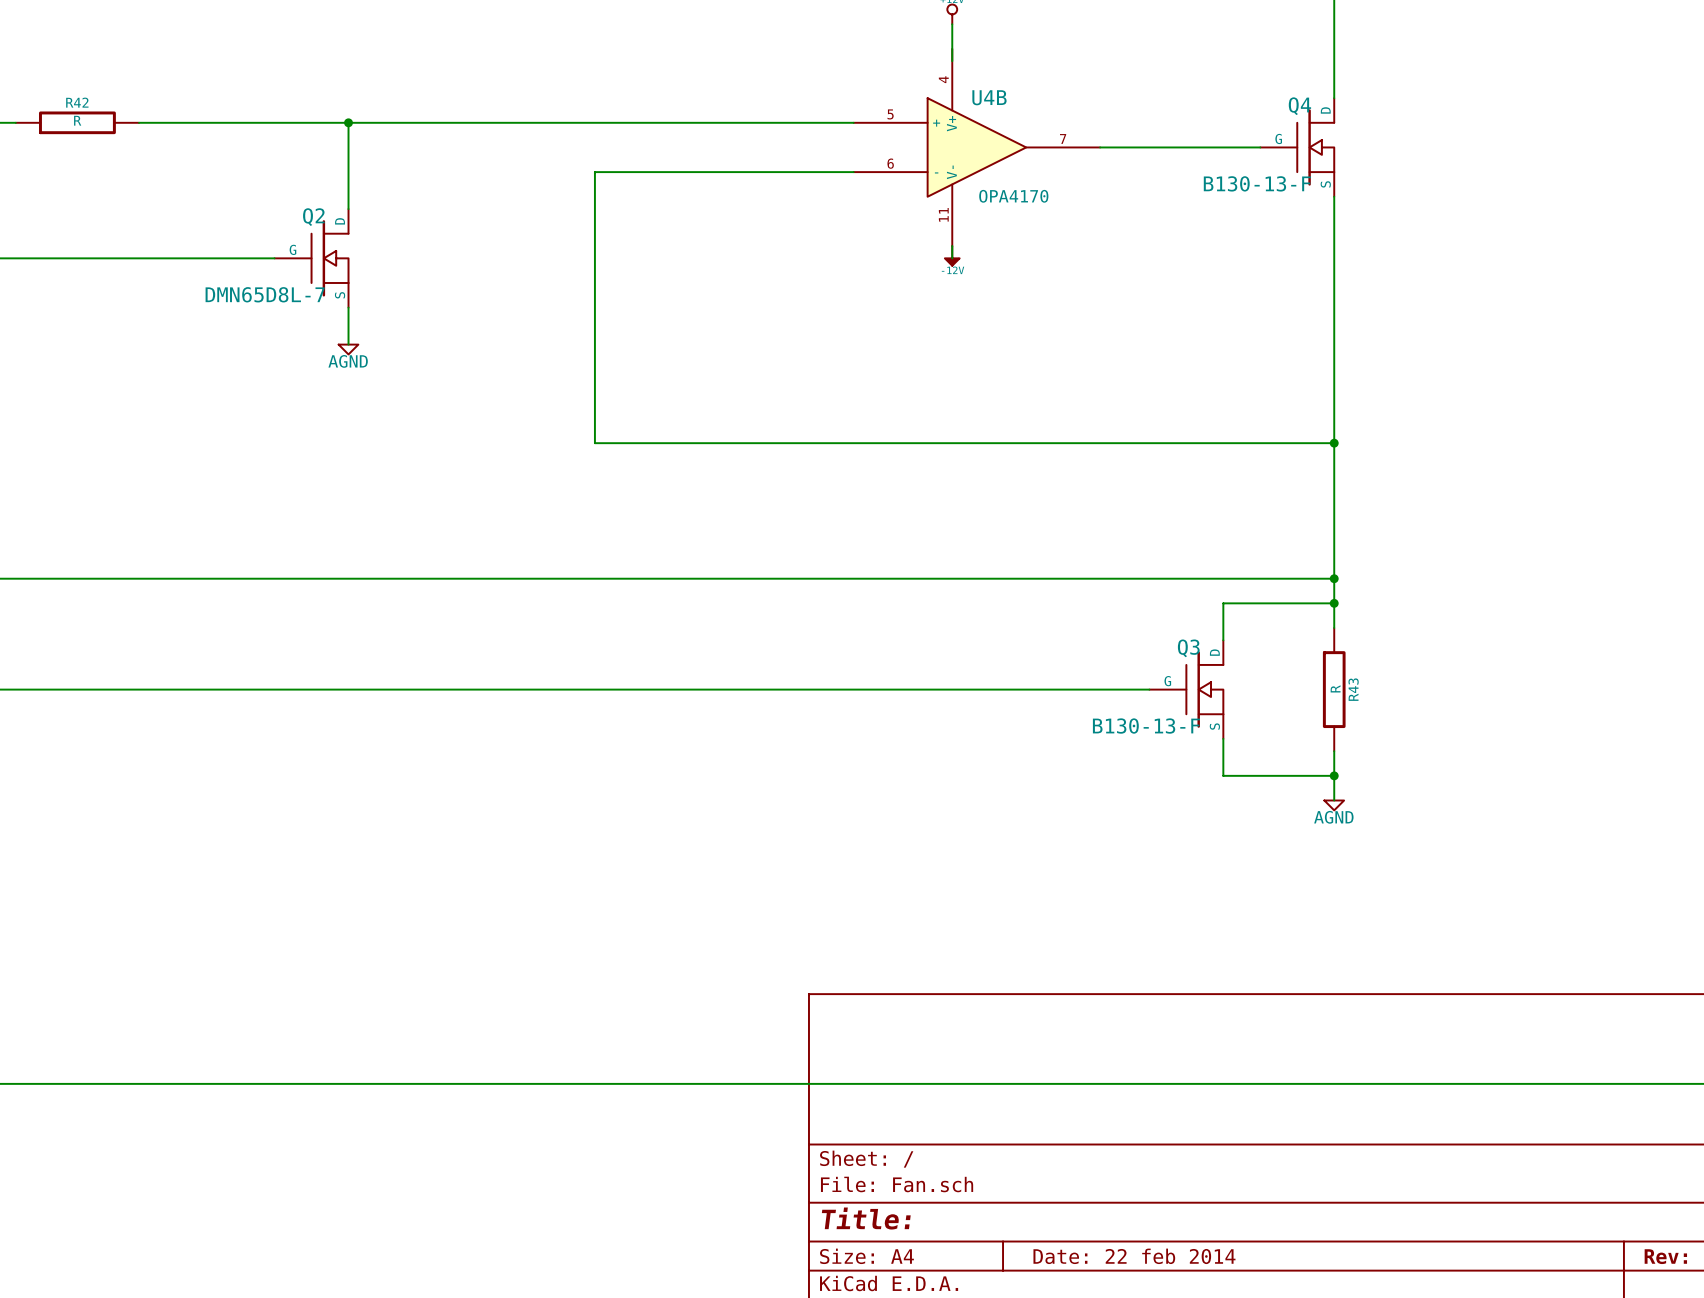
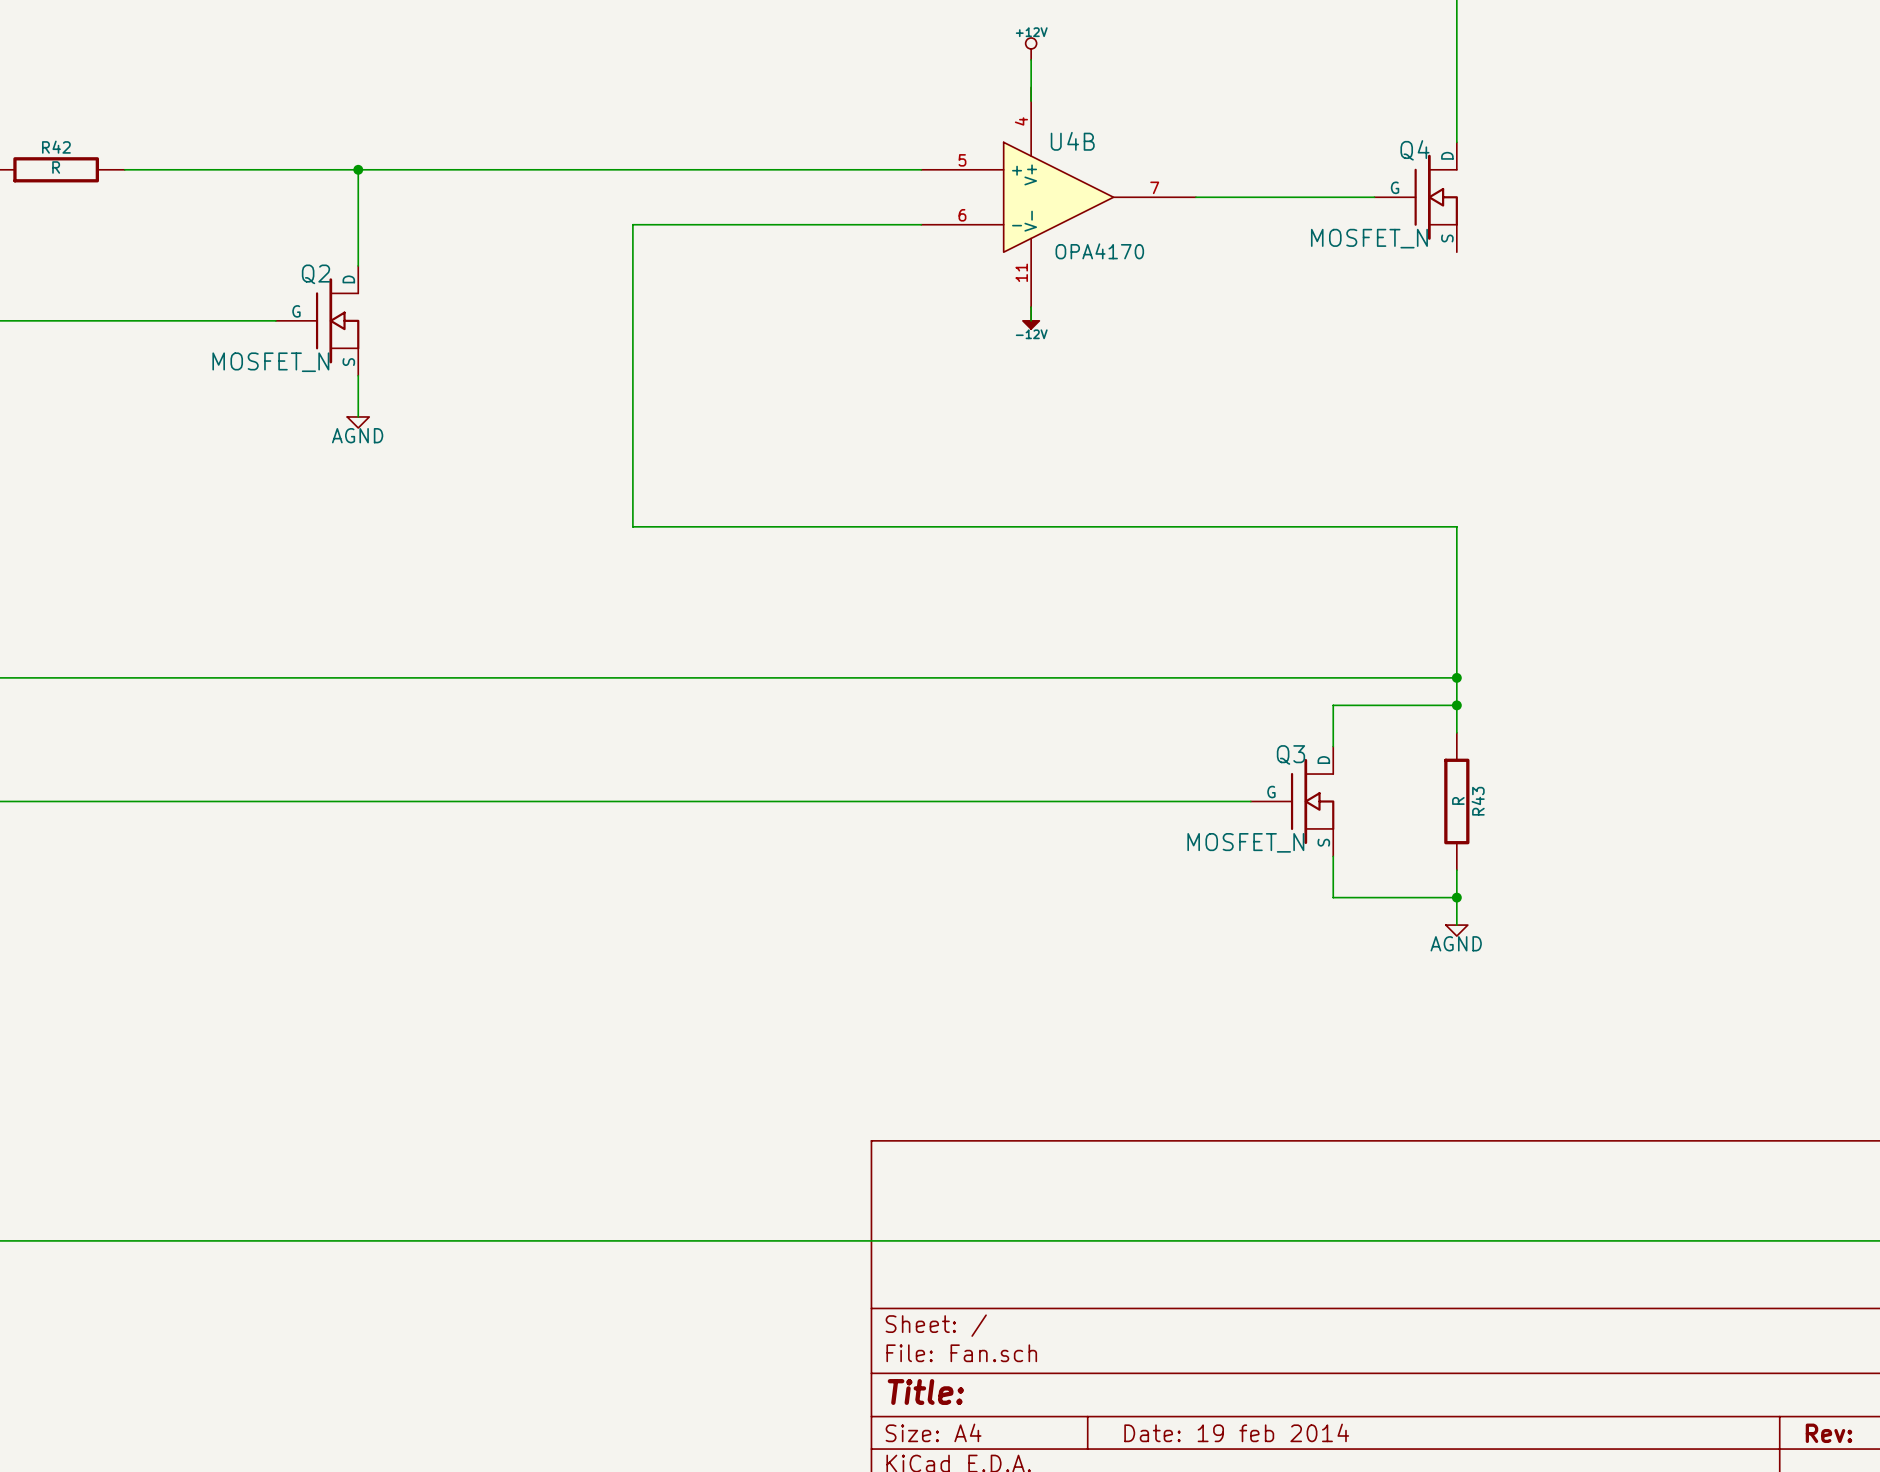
Q4 value: B130-13-F (1257, 183) -> MOSFET_N (1369, 238)
wire: (1334, 196) (1334, 443) -> none
Q2 value: DMN65D8L-7 (265, 294) -> MOSFET_N (270, 362)
junction: (1334, 443) -> none
Q3 value: B130-13-F (1146, 726) -> MOSFET_N (1245, 842)
title block: Date: 22 feb 2014 (1134, 1256) -> Date: 19 feb 2014 (1236, 1432)

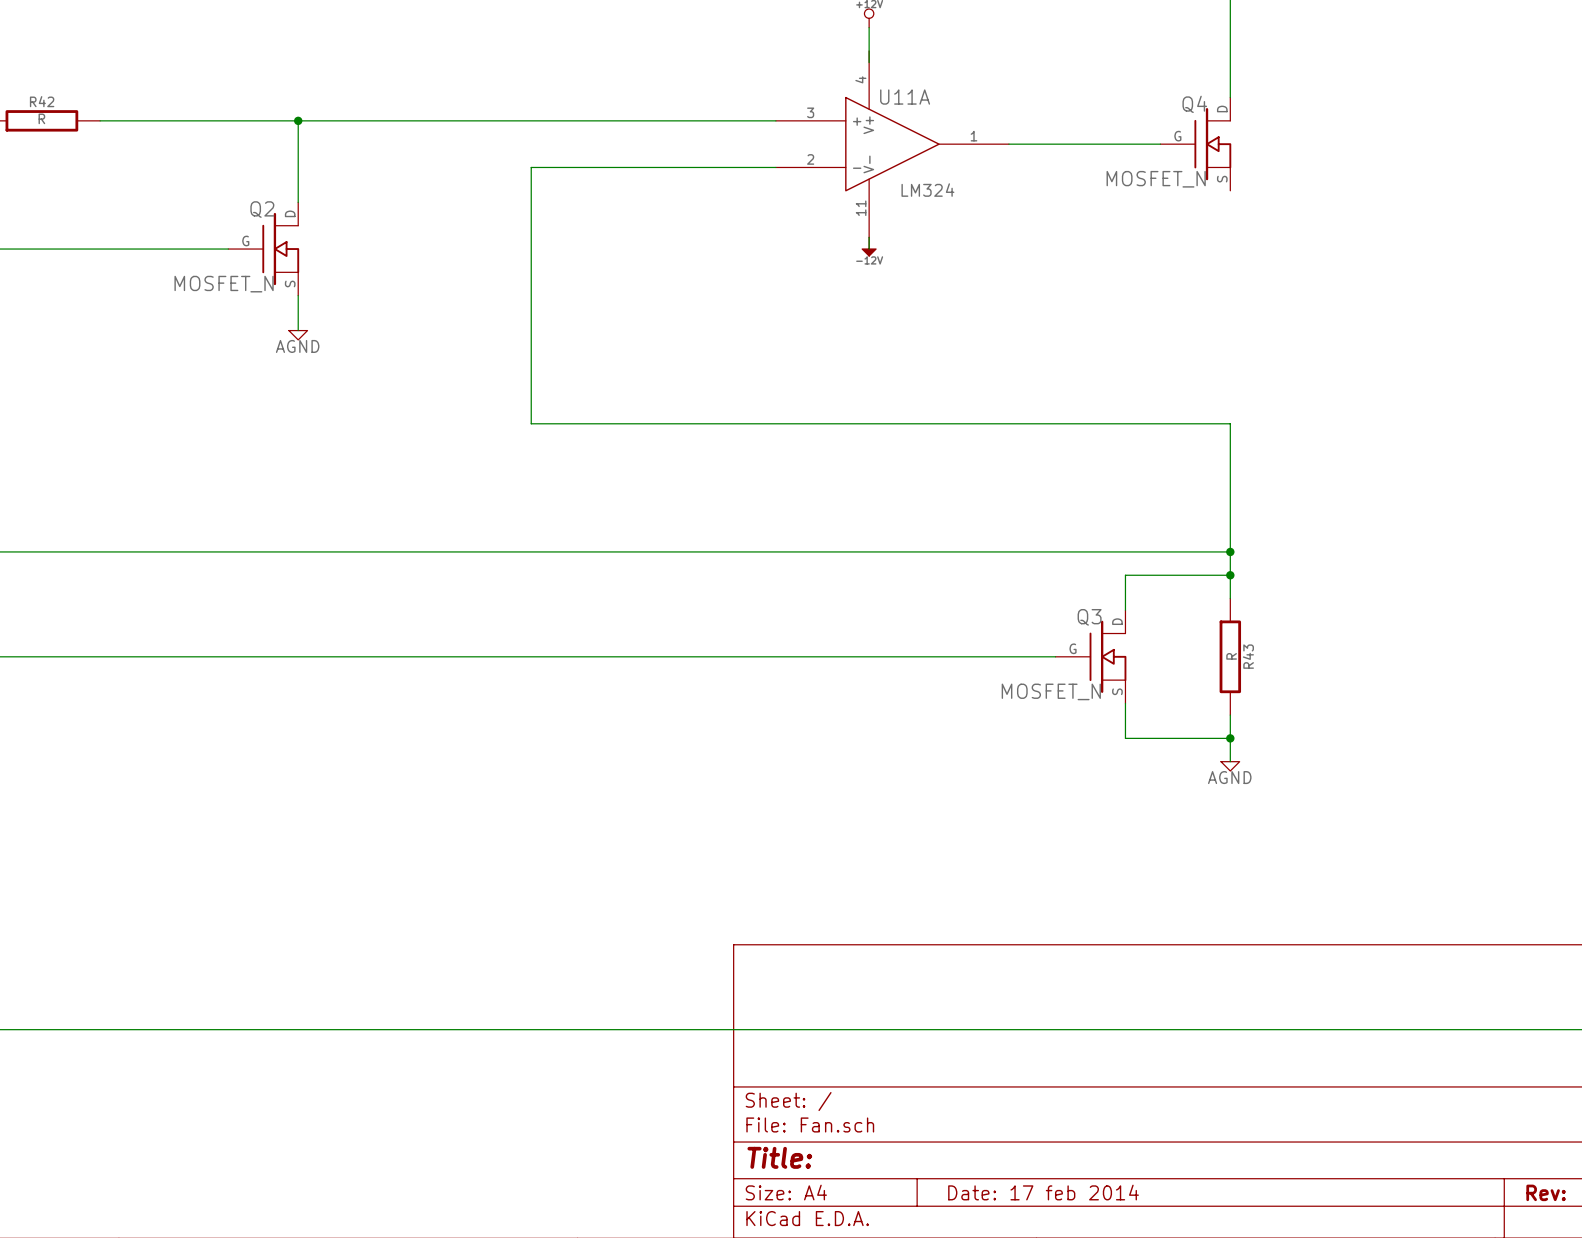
U4B name: U4B (1072, 141) -> U11A (905, 97)
U4B pin number: 5 (962, 160) -> 3 (810, 112)
U4B pin number: 7 (1154, 187) -> 1 (973, 136)
U4B pin number: 6 (962, 215) -> 2 (810, 159)
U4B value: OPA4170 (1099, 251) -> LM324 (927, 190)
title block: Date: 19 feb 2014 (1236, 1432) -> Date: 17 feb 2014 (1043, 1192)

